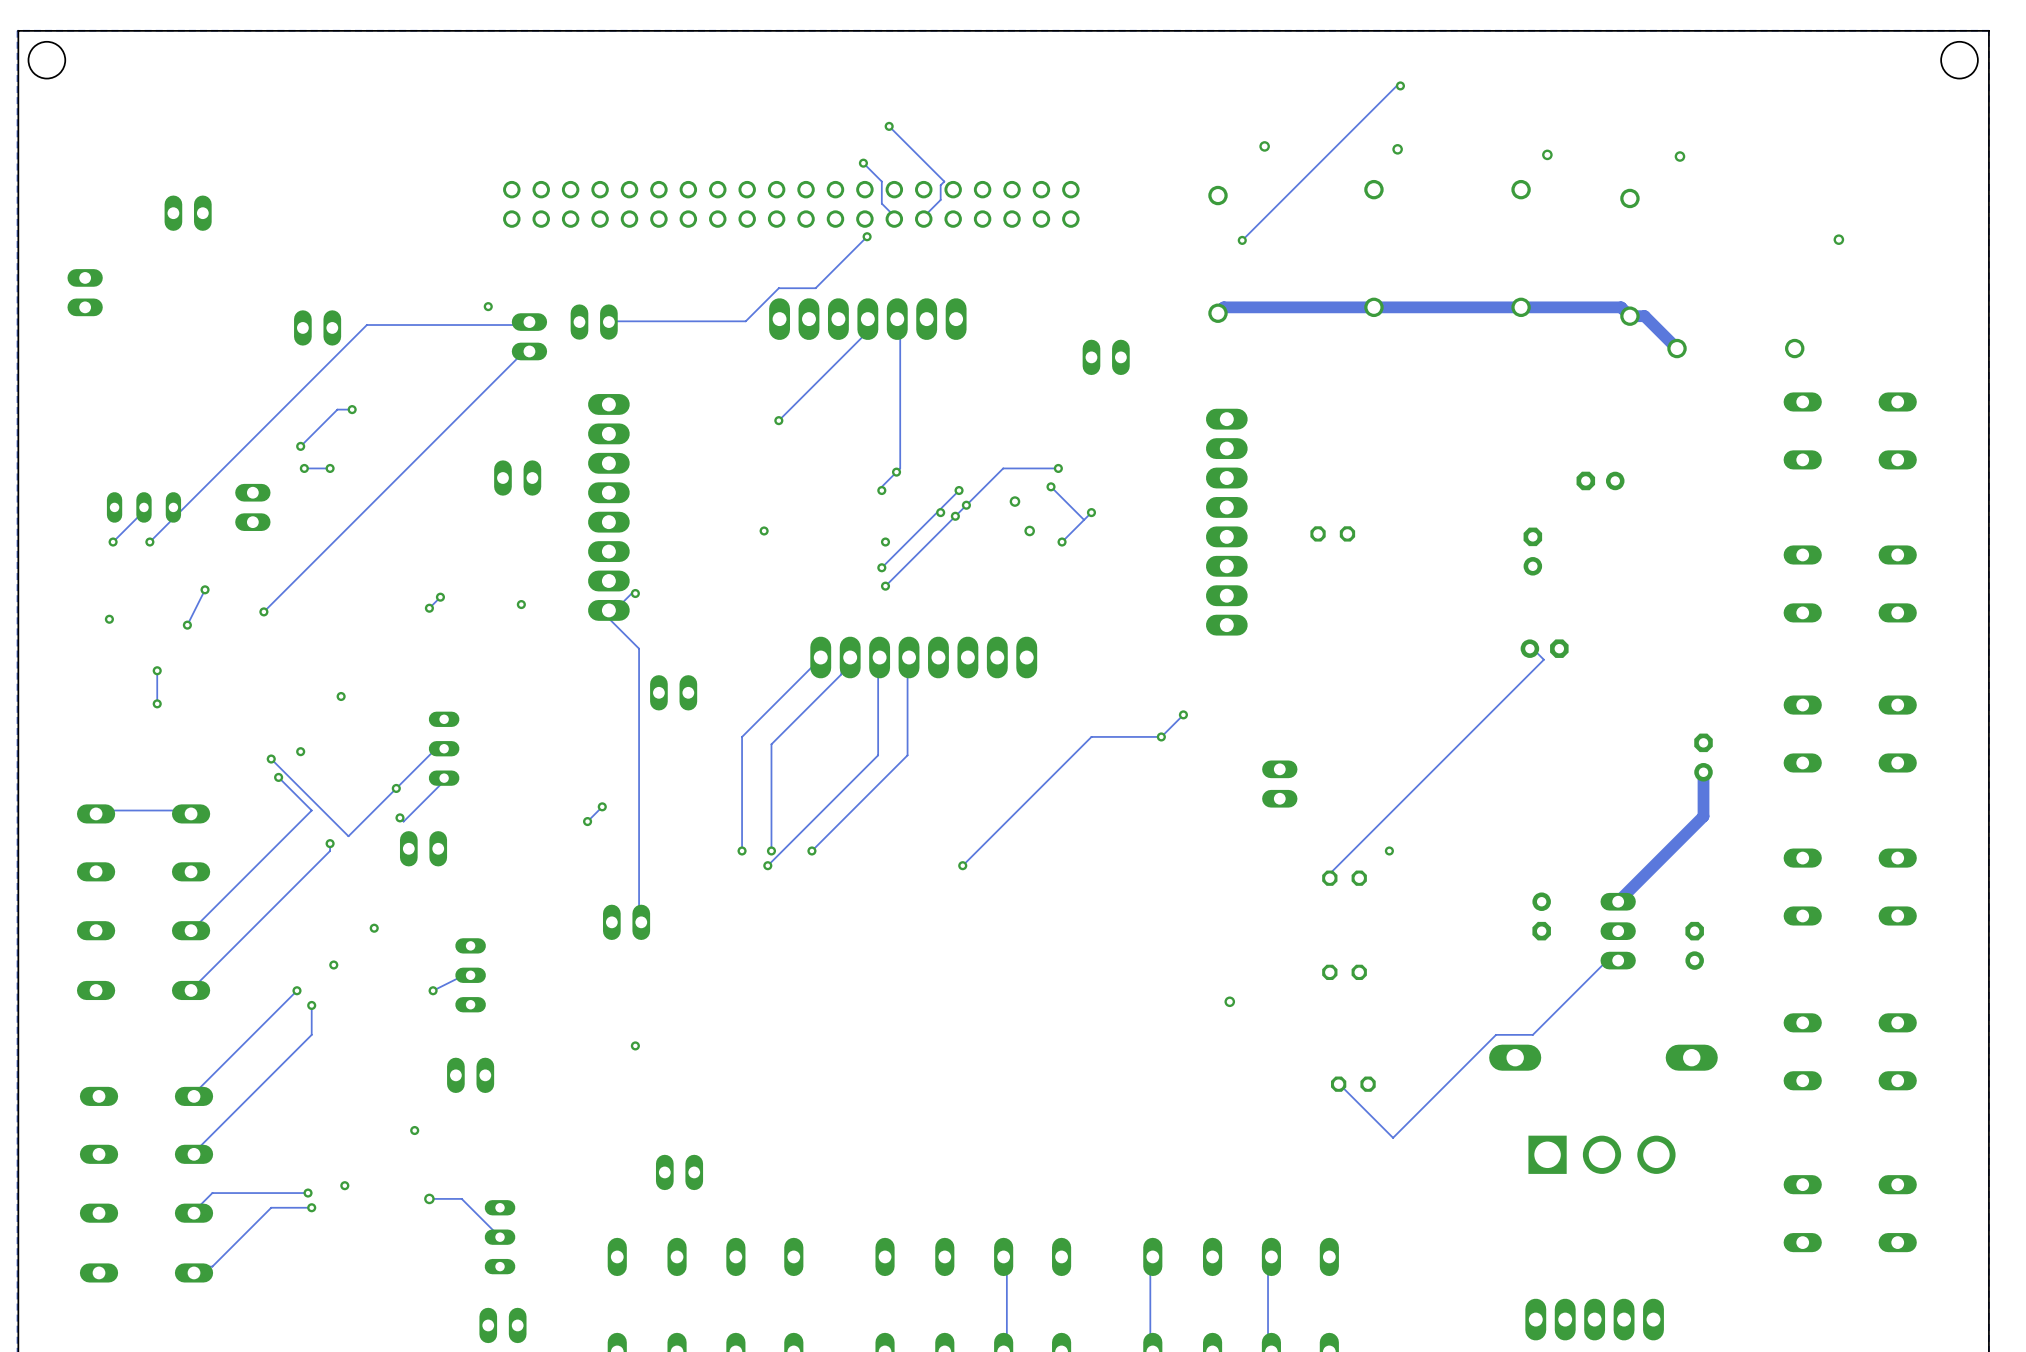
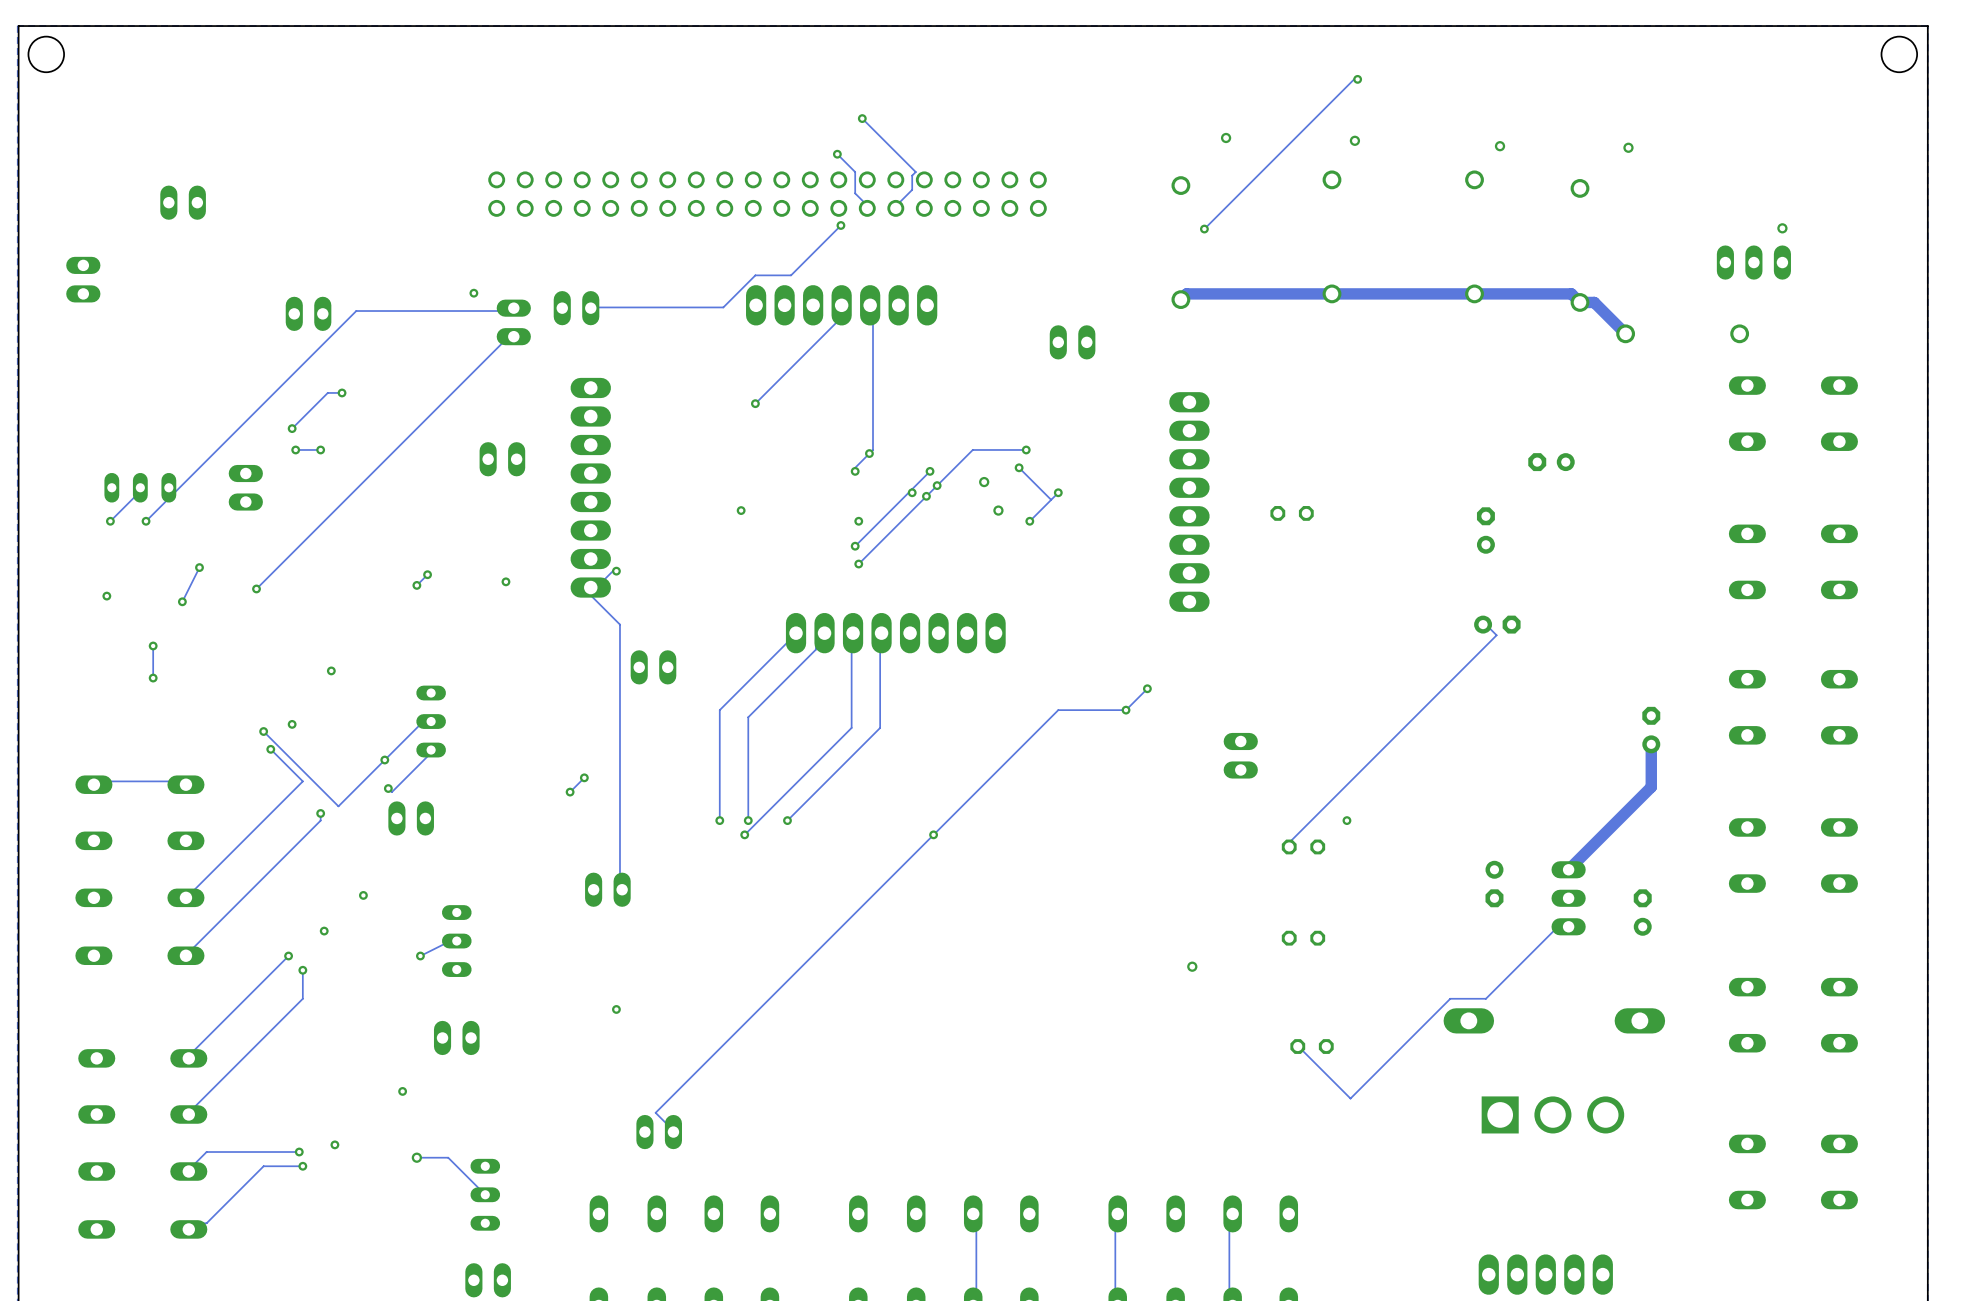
part: none -> (1753, 262)
track: none -> (933, 834) (655, 1112) (673, 1132)

